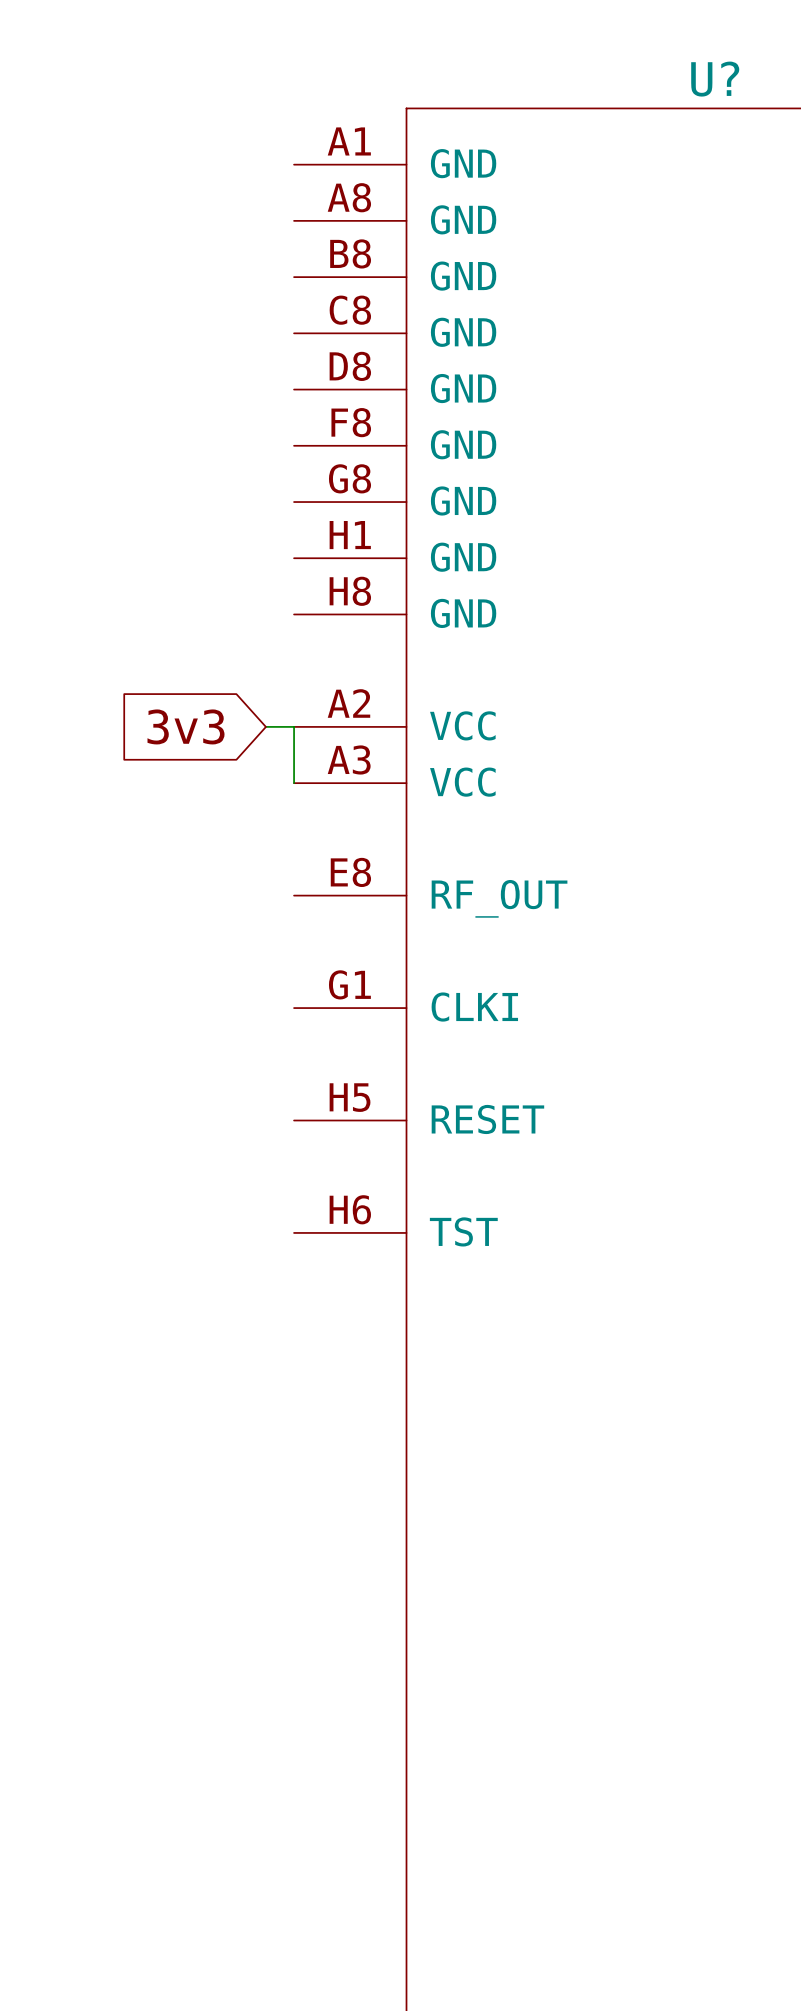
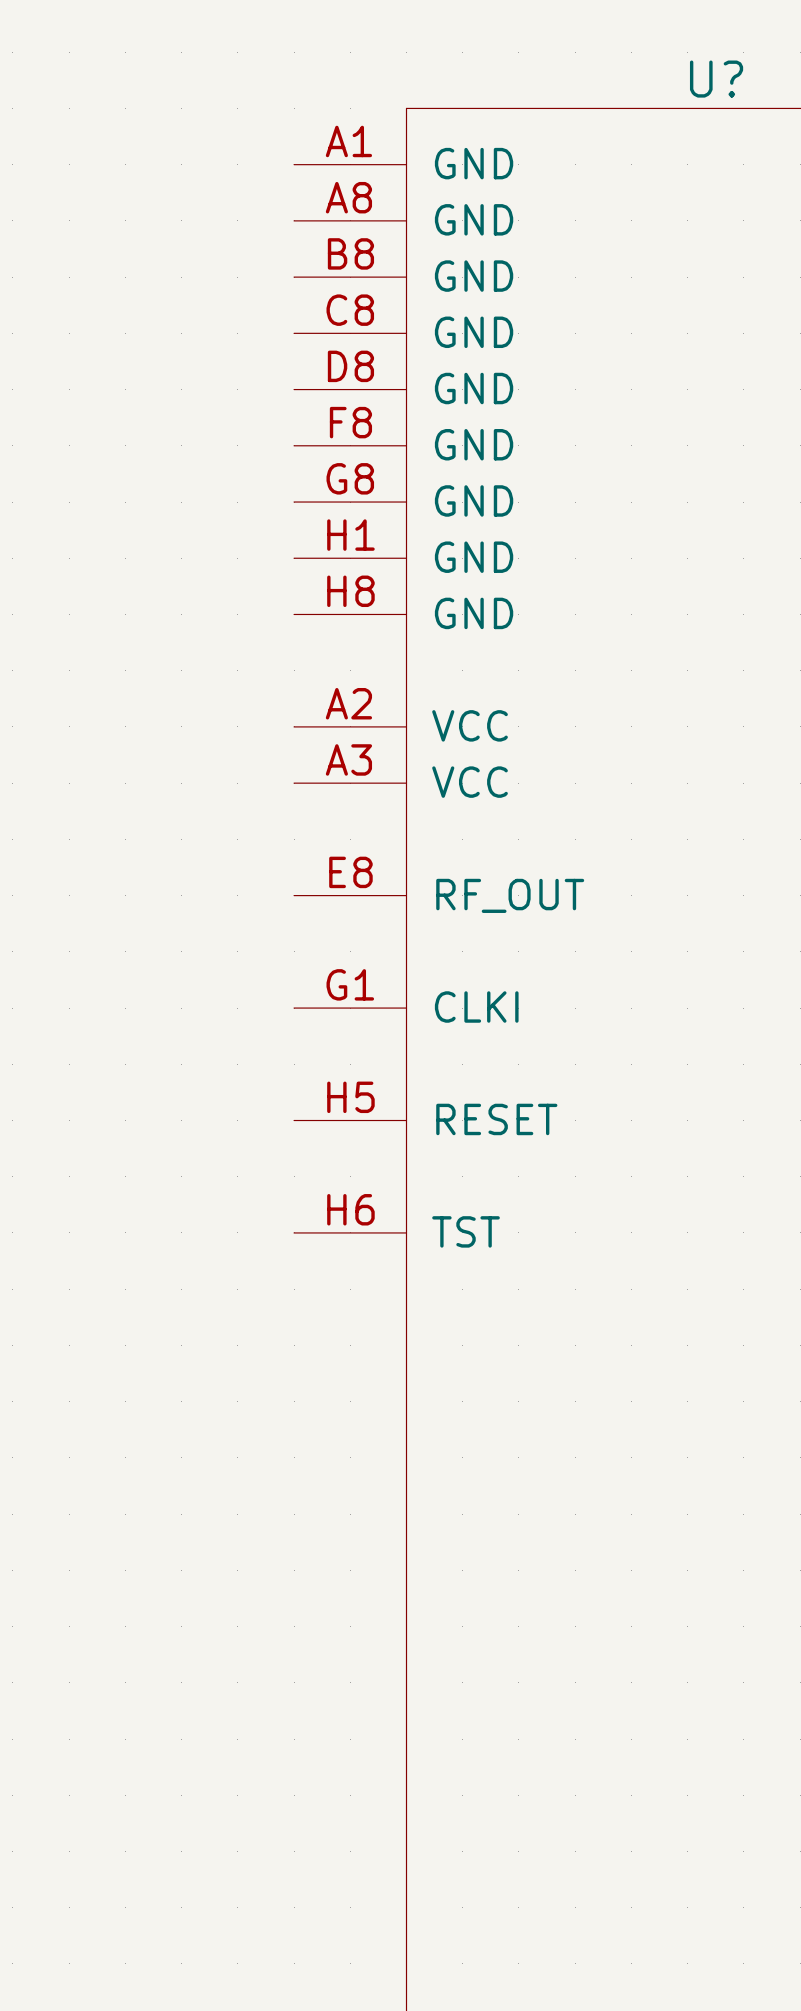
global label: 3v3 (186, 726) -> none
wire: (265, 726) (294, 726) (294, 783) -> none

